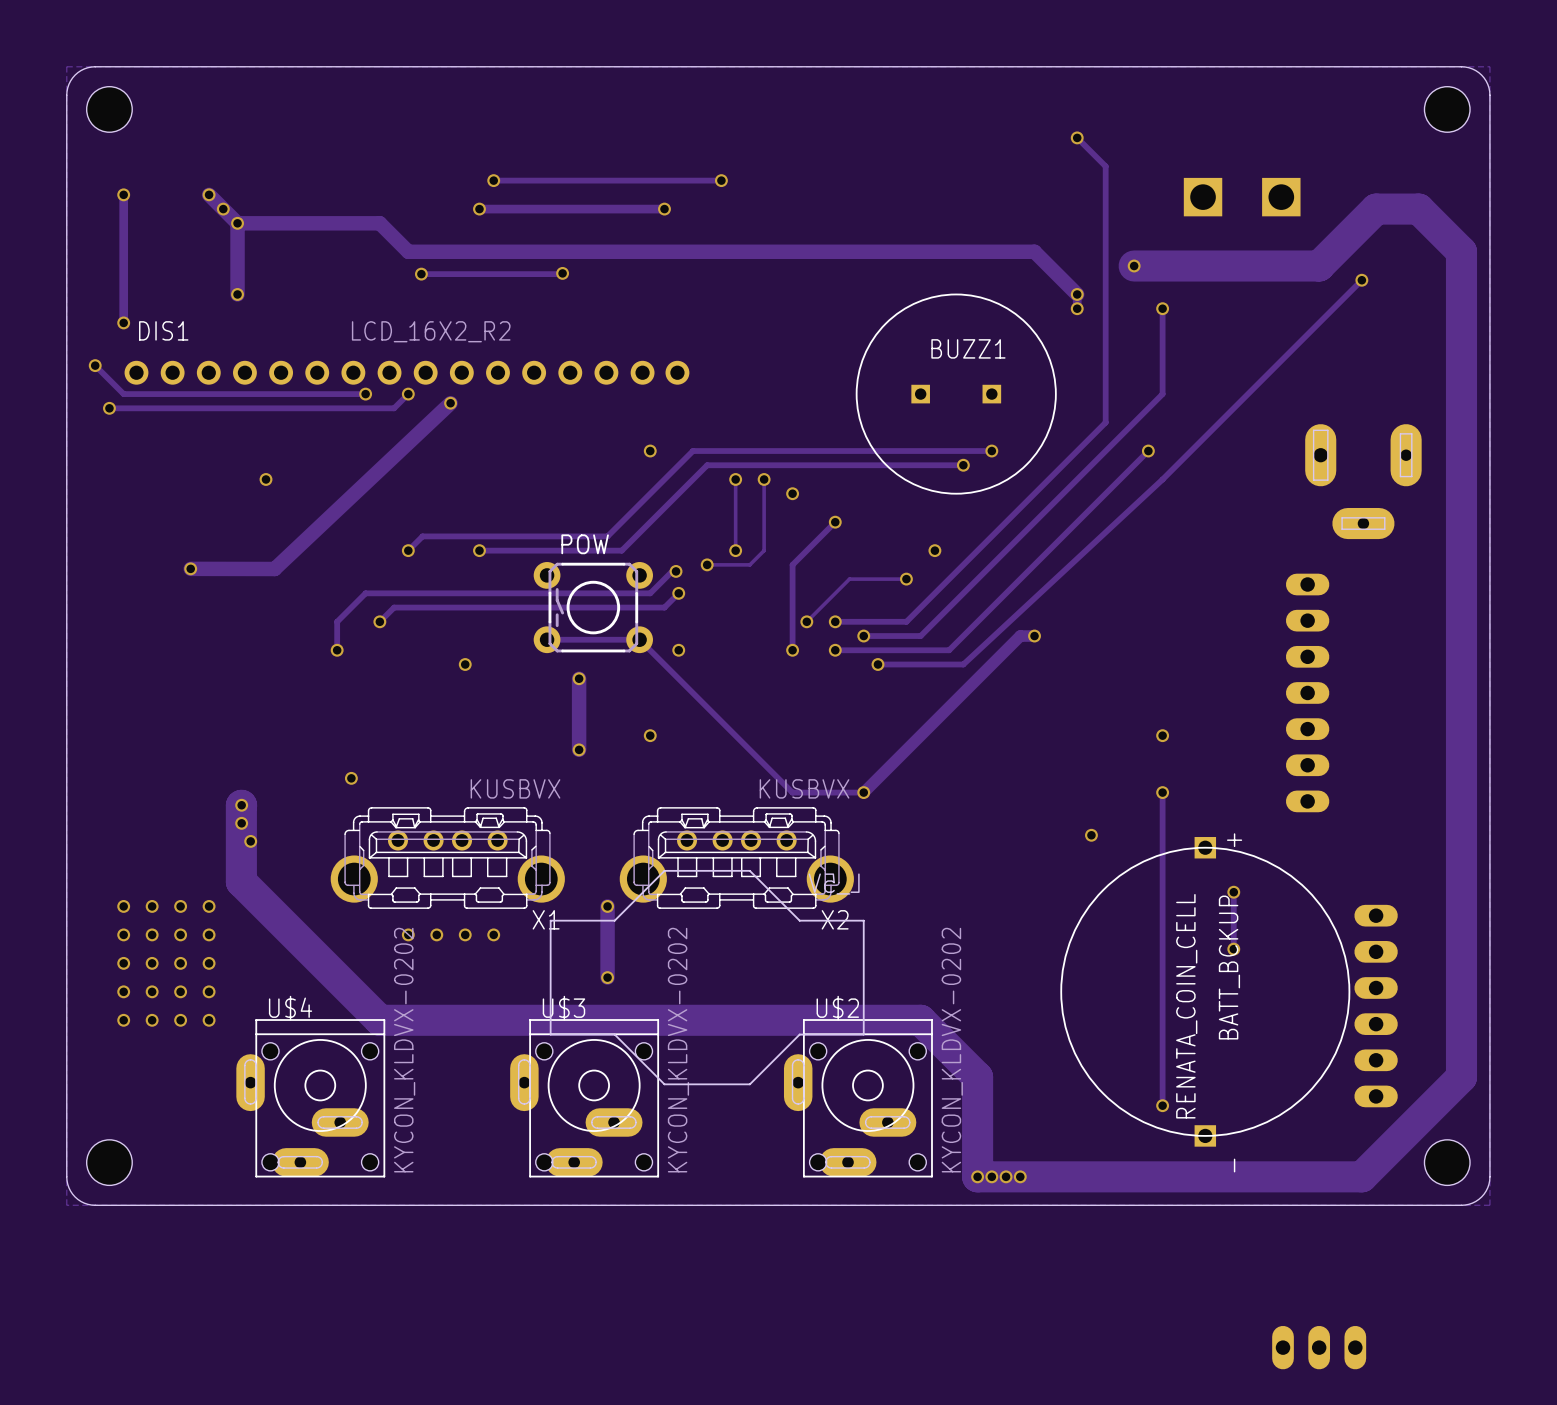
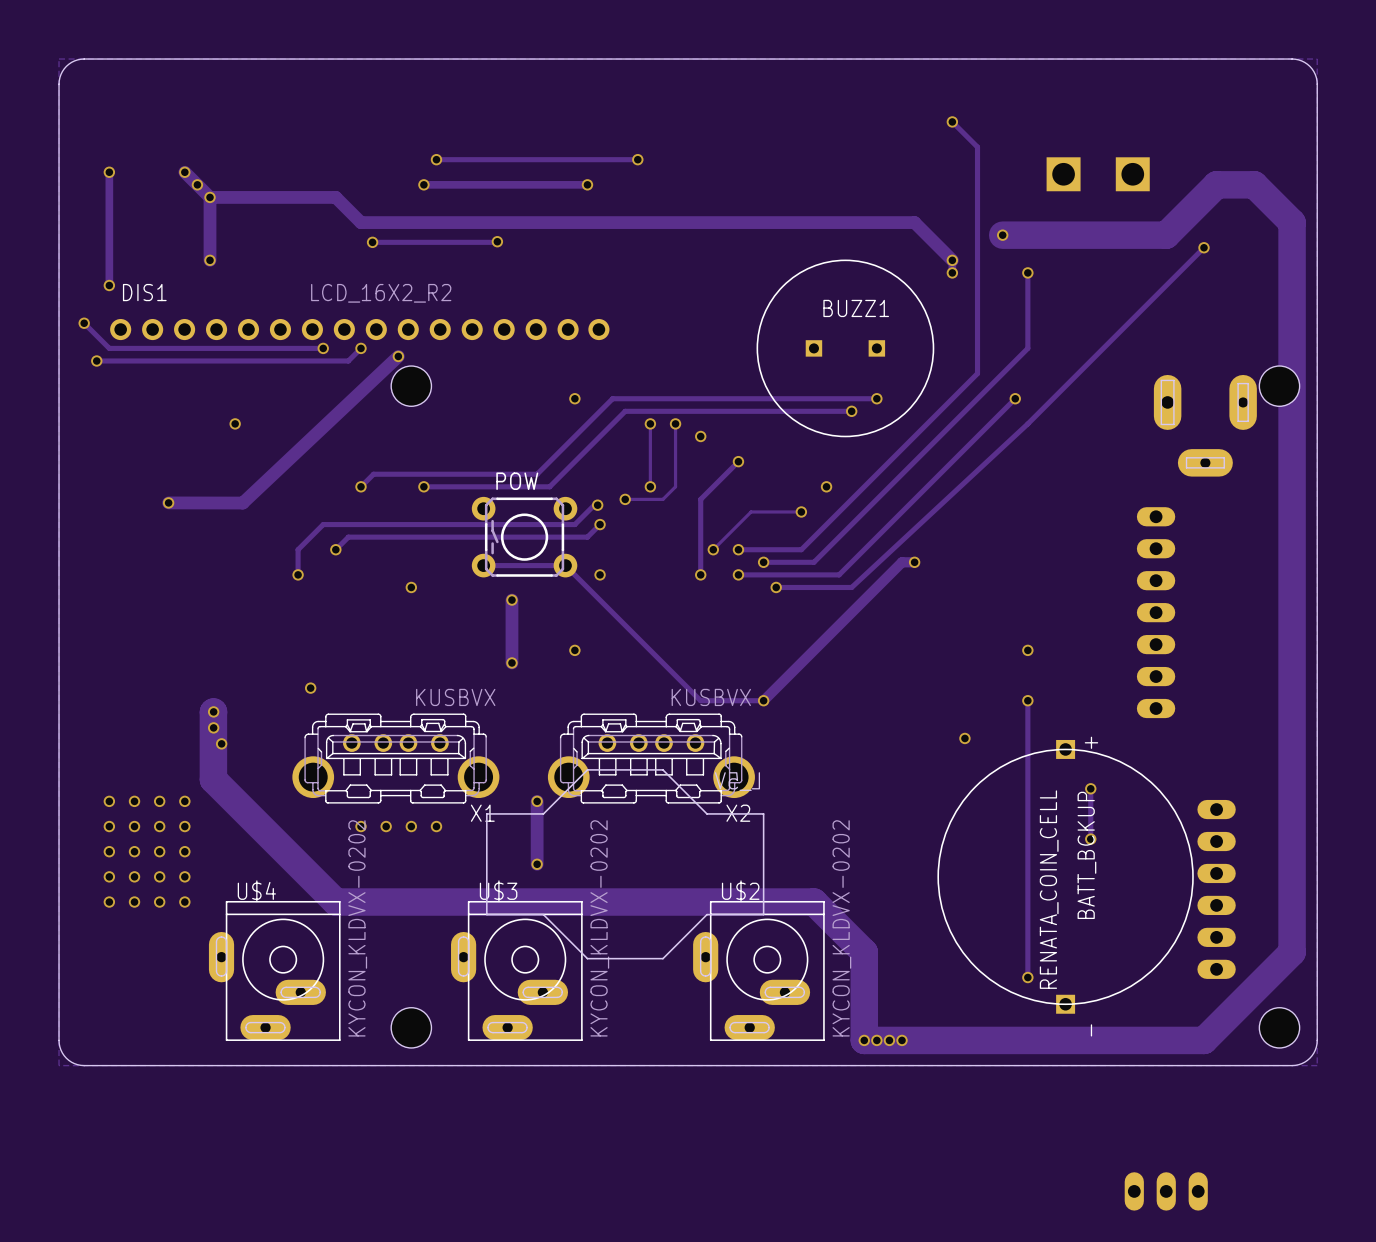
hole: (109, 109) -> none
hole position: (1447, 109) -> (1279, 386)
hole: none -> (411, 386)
U$4 footprint: [236, 1019, 386, 1178] -> [208, 900, 341, 1041]
U$3 footprint: [510, 1019, 660, 1178] -> [451, 900, 583, 1041]
U$2 footprint: [783, 1019, 933, 1178] -> [693, 900, 825, 1041]
hole position: (109, 1162) -> (411, 1027)

